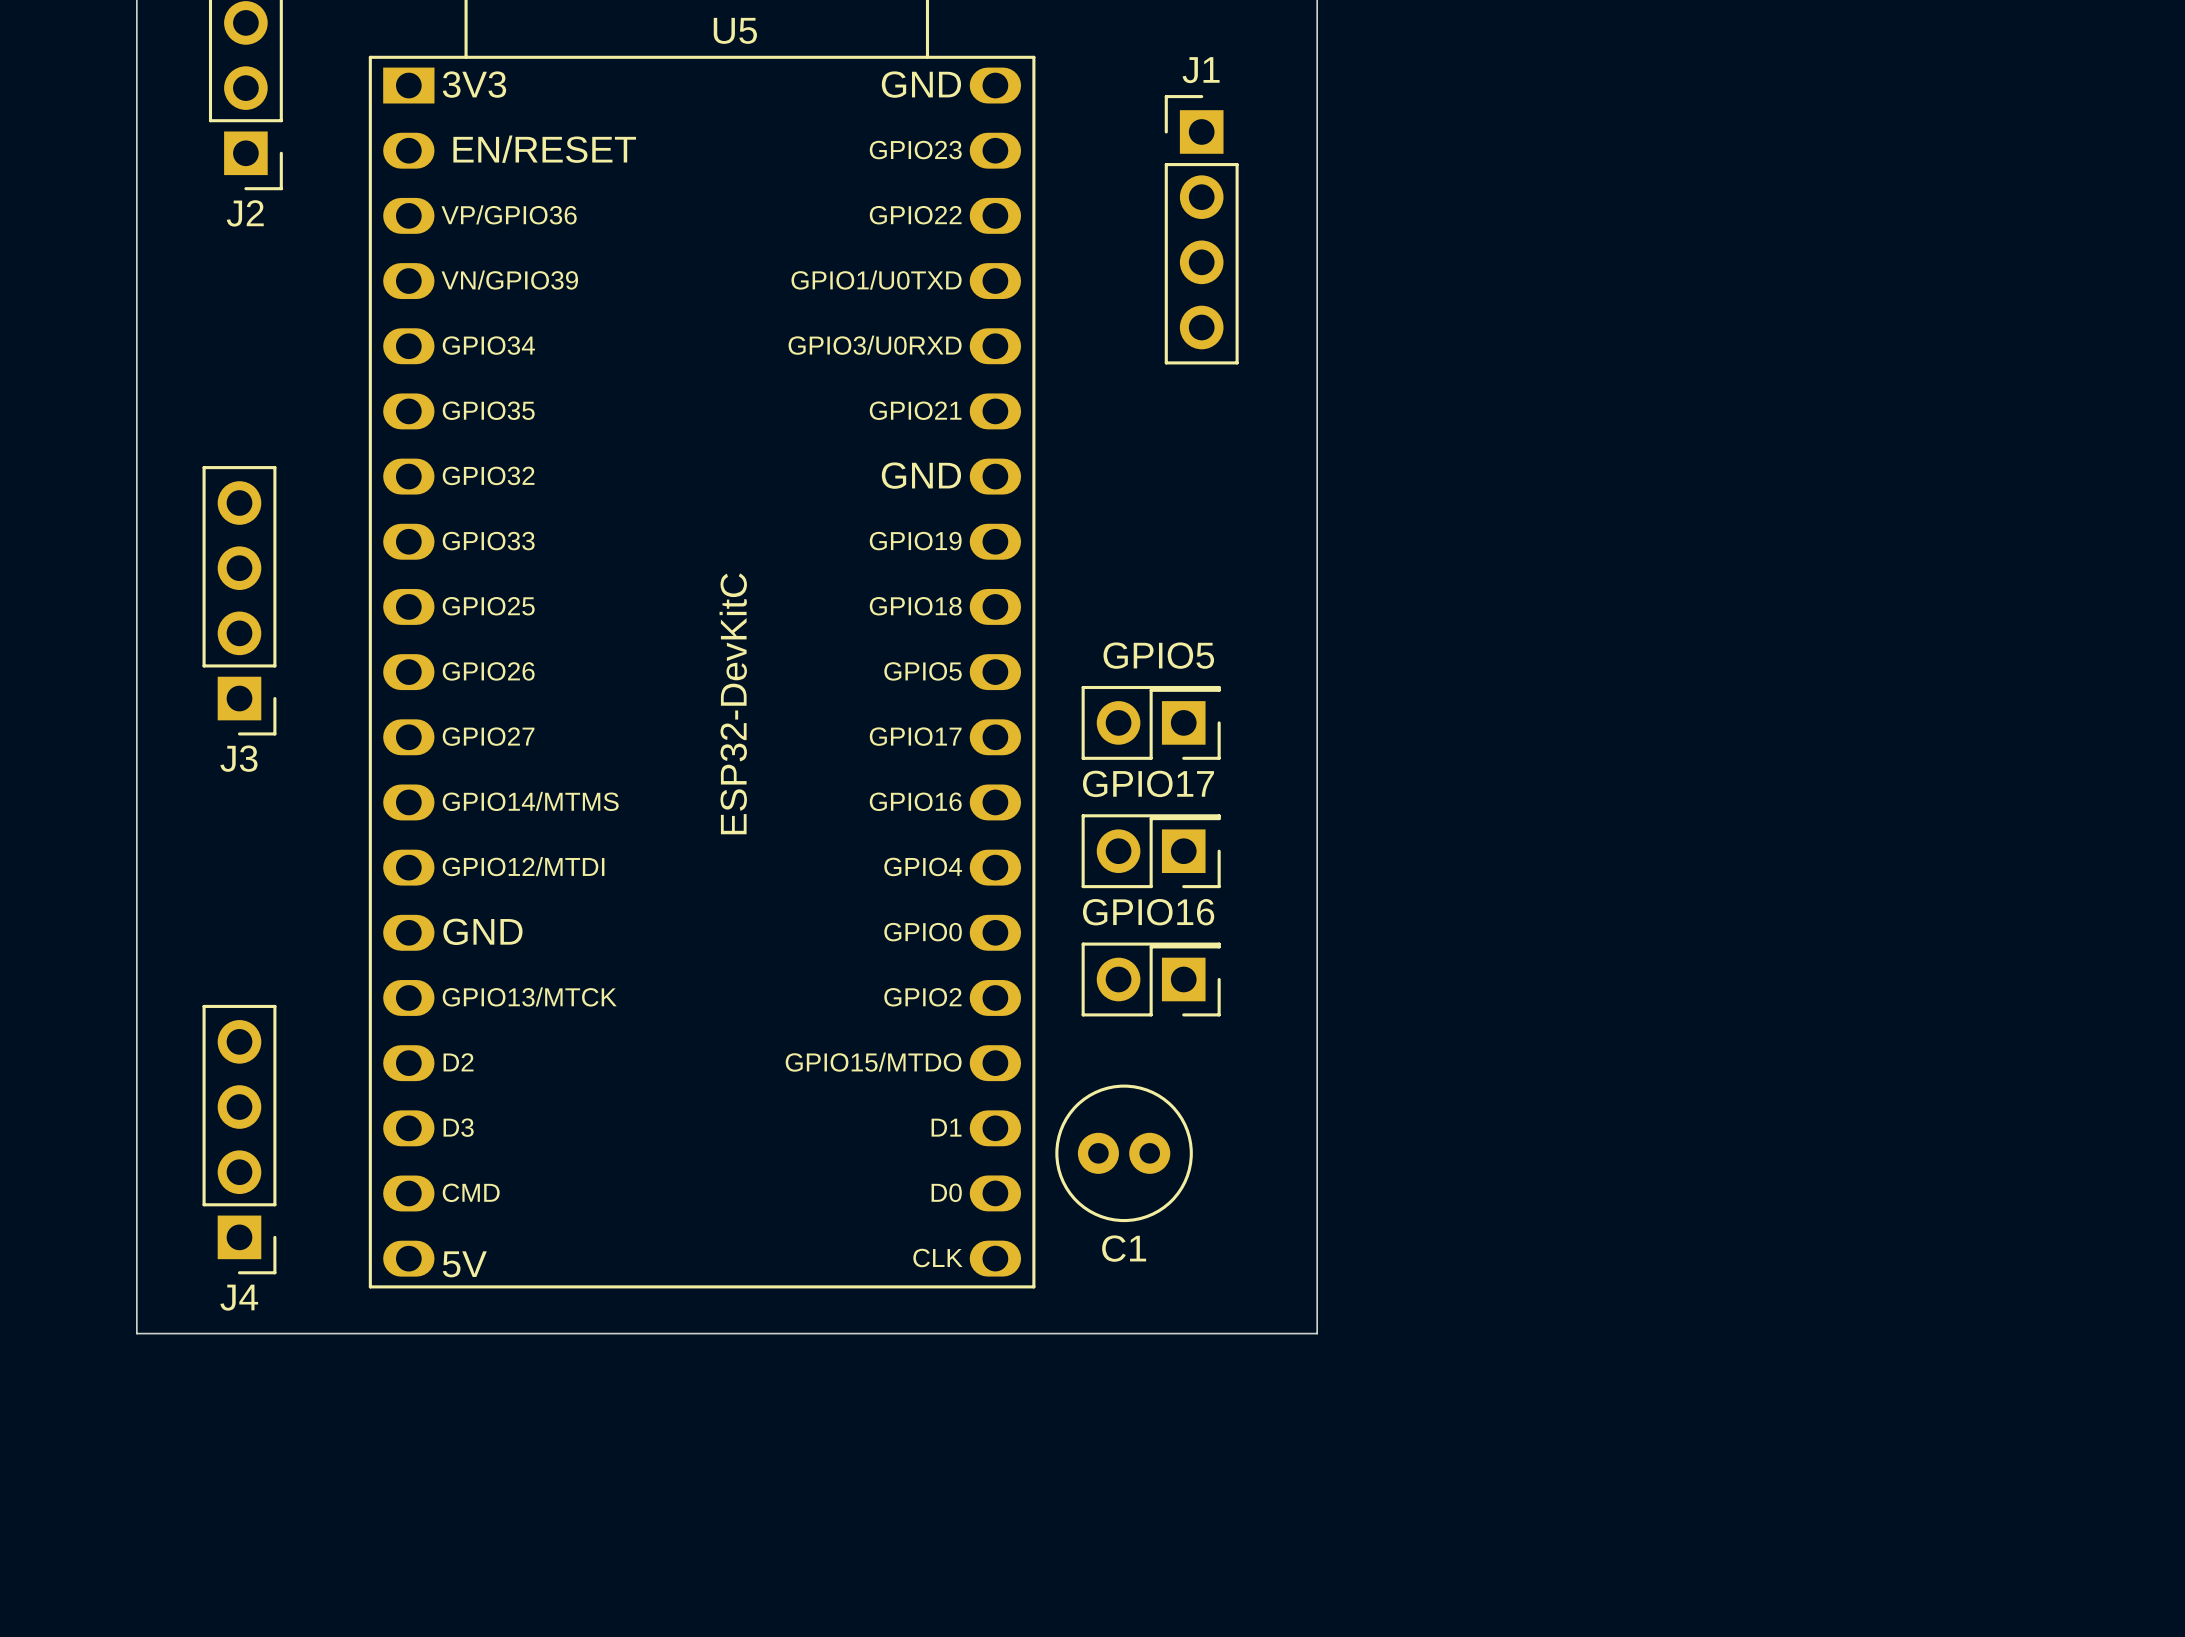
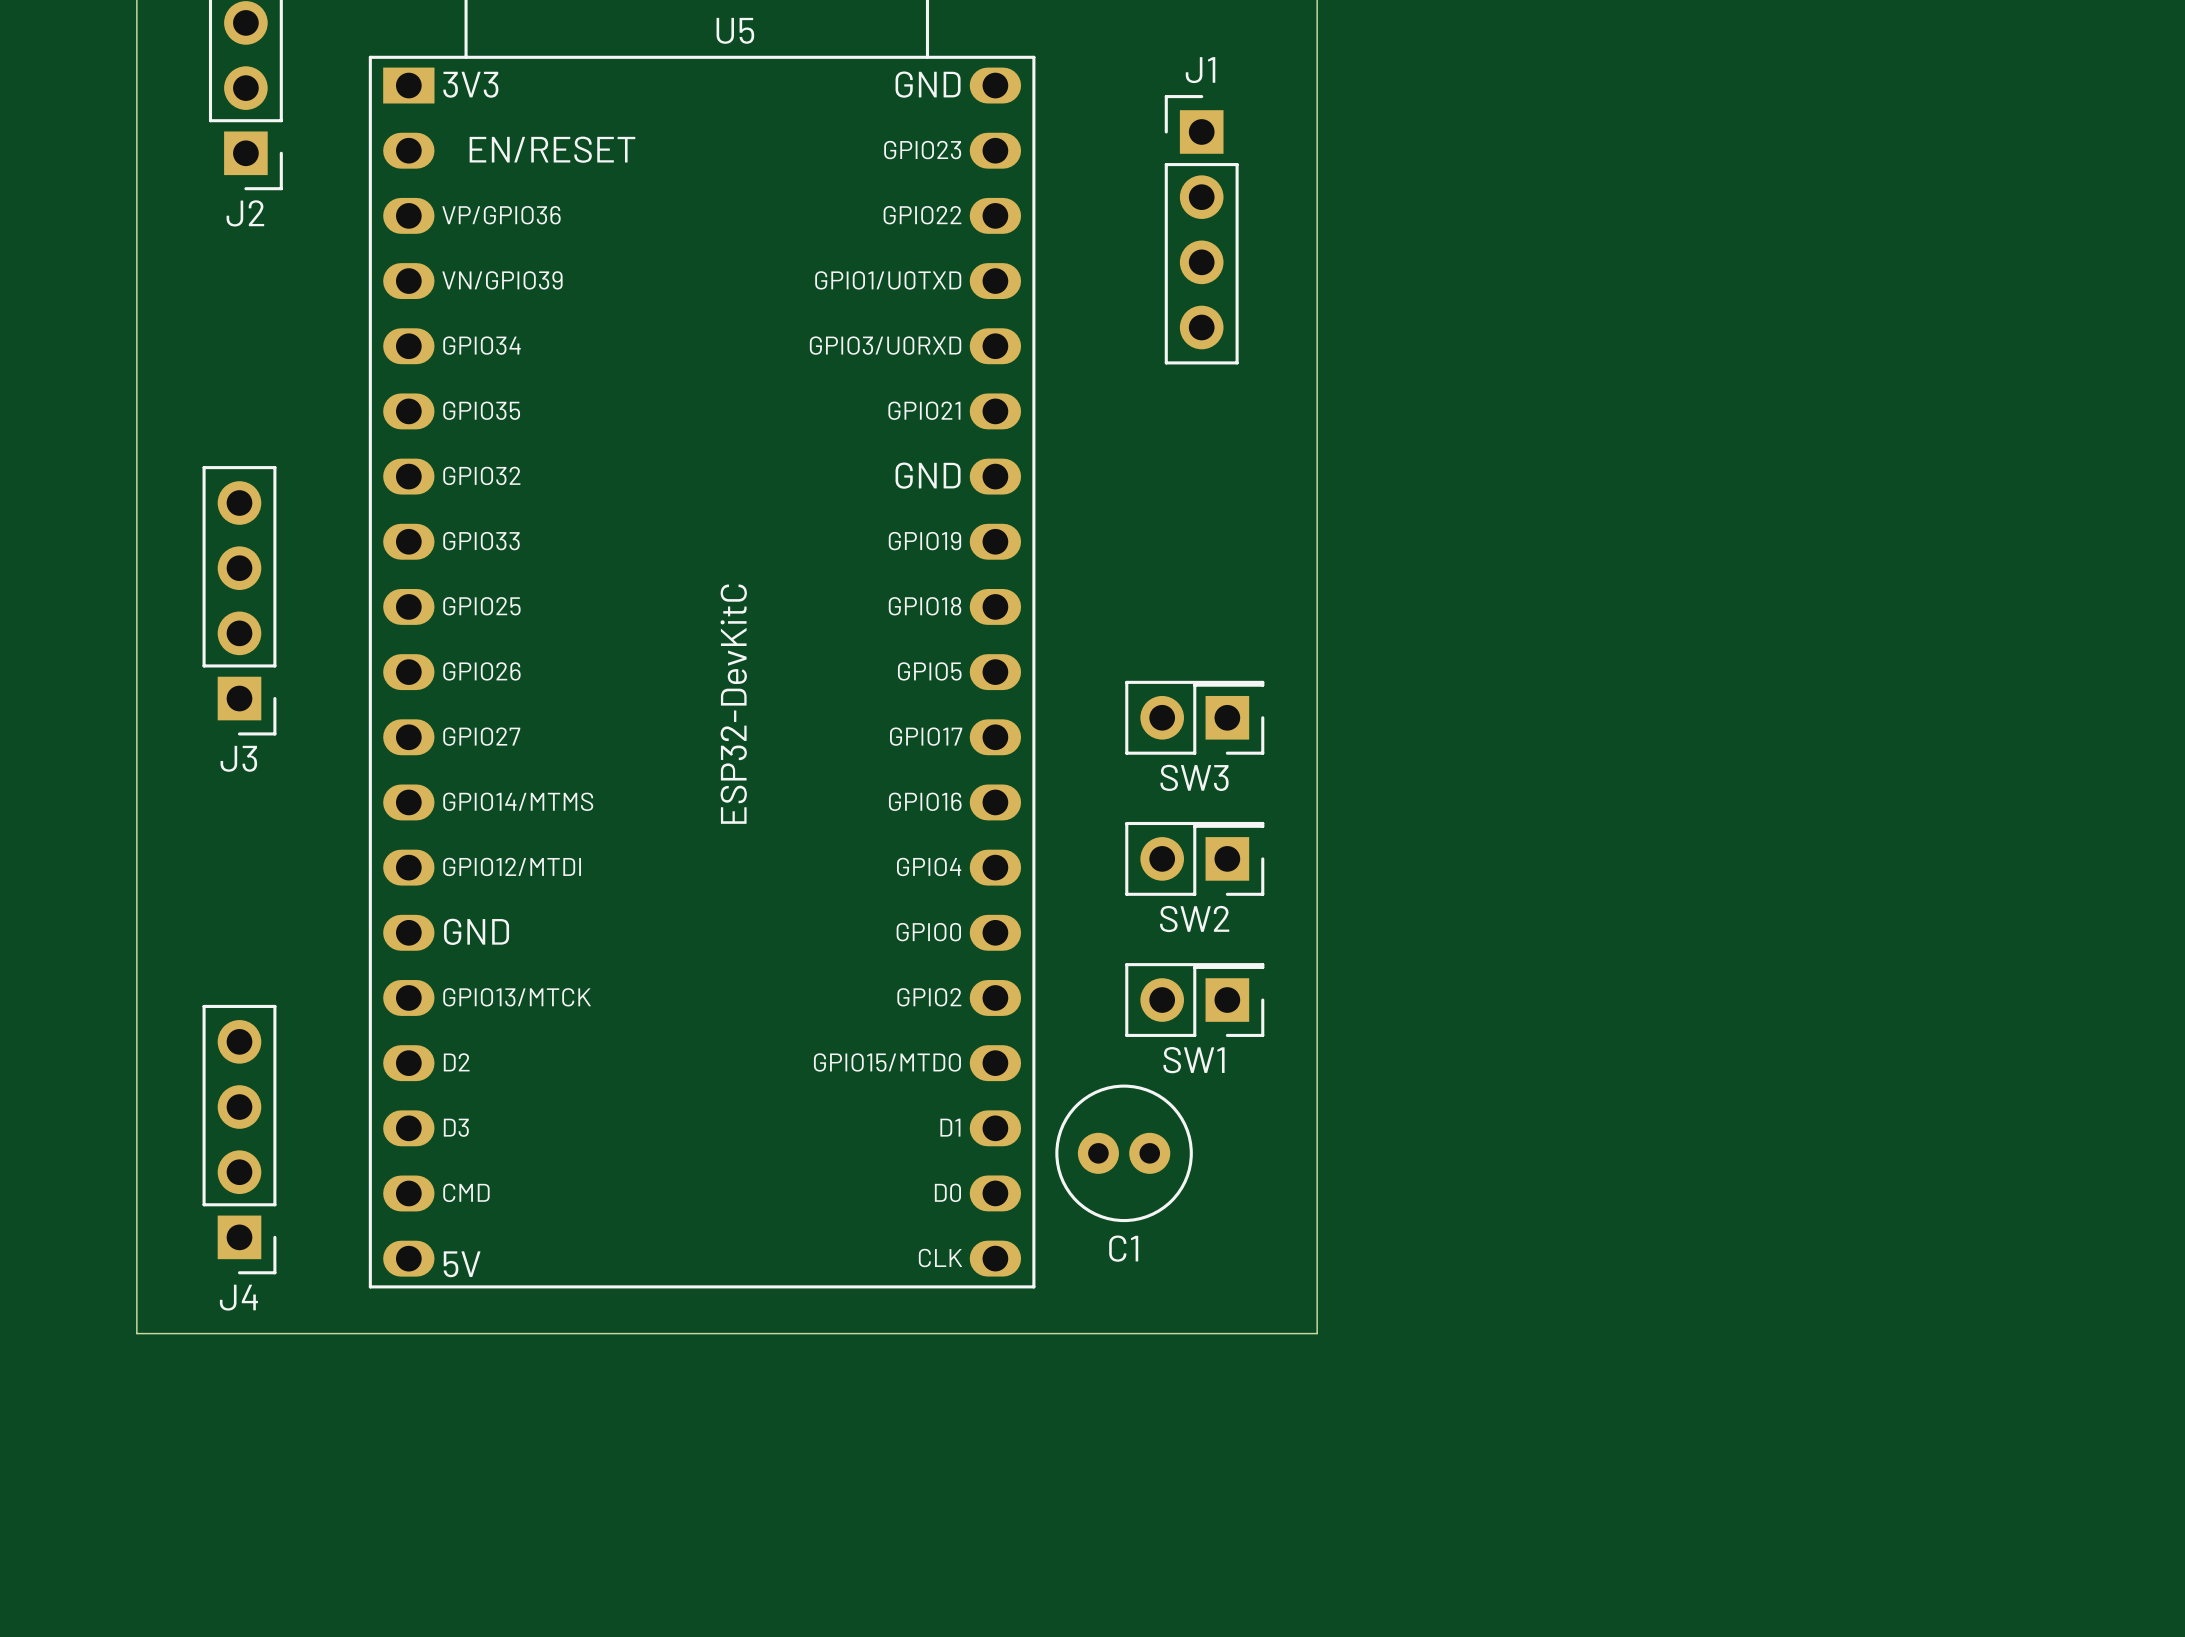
text: GPIO5 (1158, 655) -> none
SW3: none -> (1194, 717)
part: (1151, 722) -> none
text: GPIO17 (1148, 783) -> none
part: (1151, 851) -> none
SW2: none -> (1194, 858)
text: GPIO16 (1148, 912) -> none
part: (1151, 979) -> none
SW1: none -> (1194, 1000)

